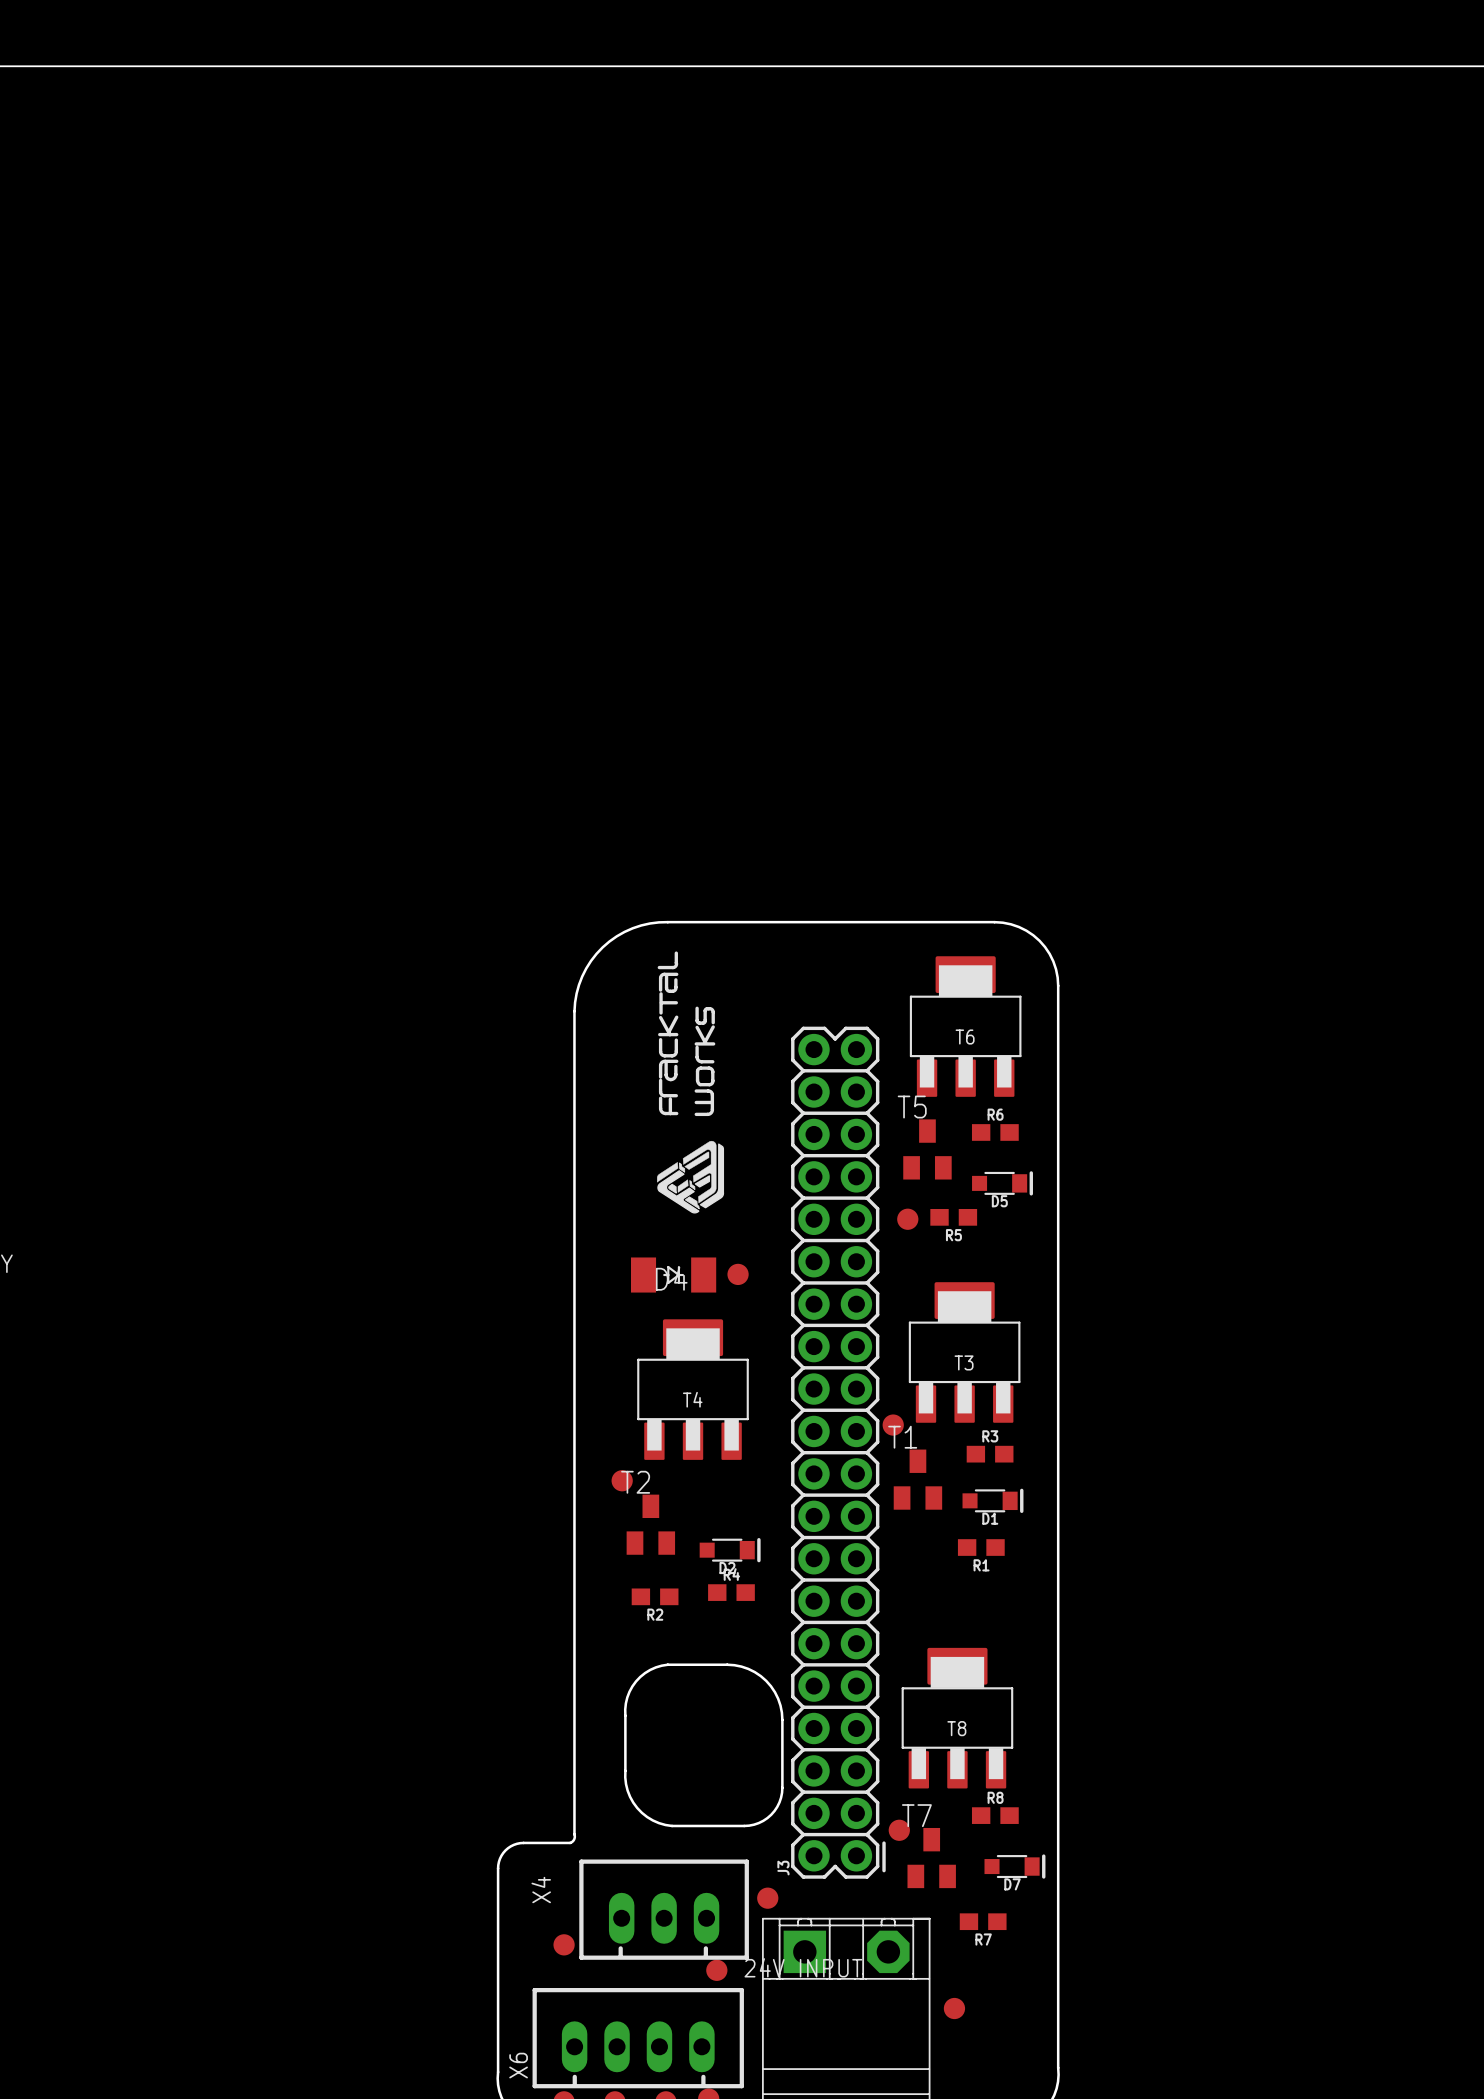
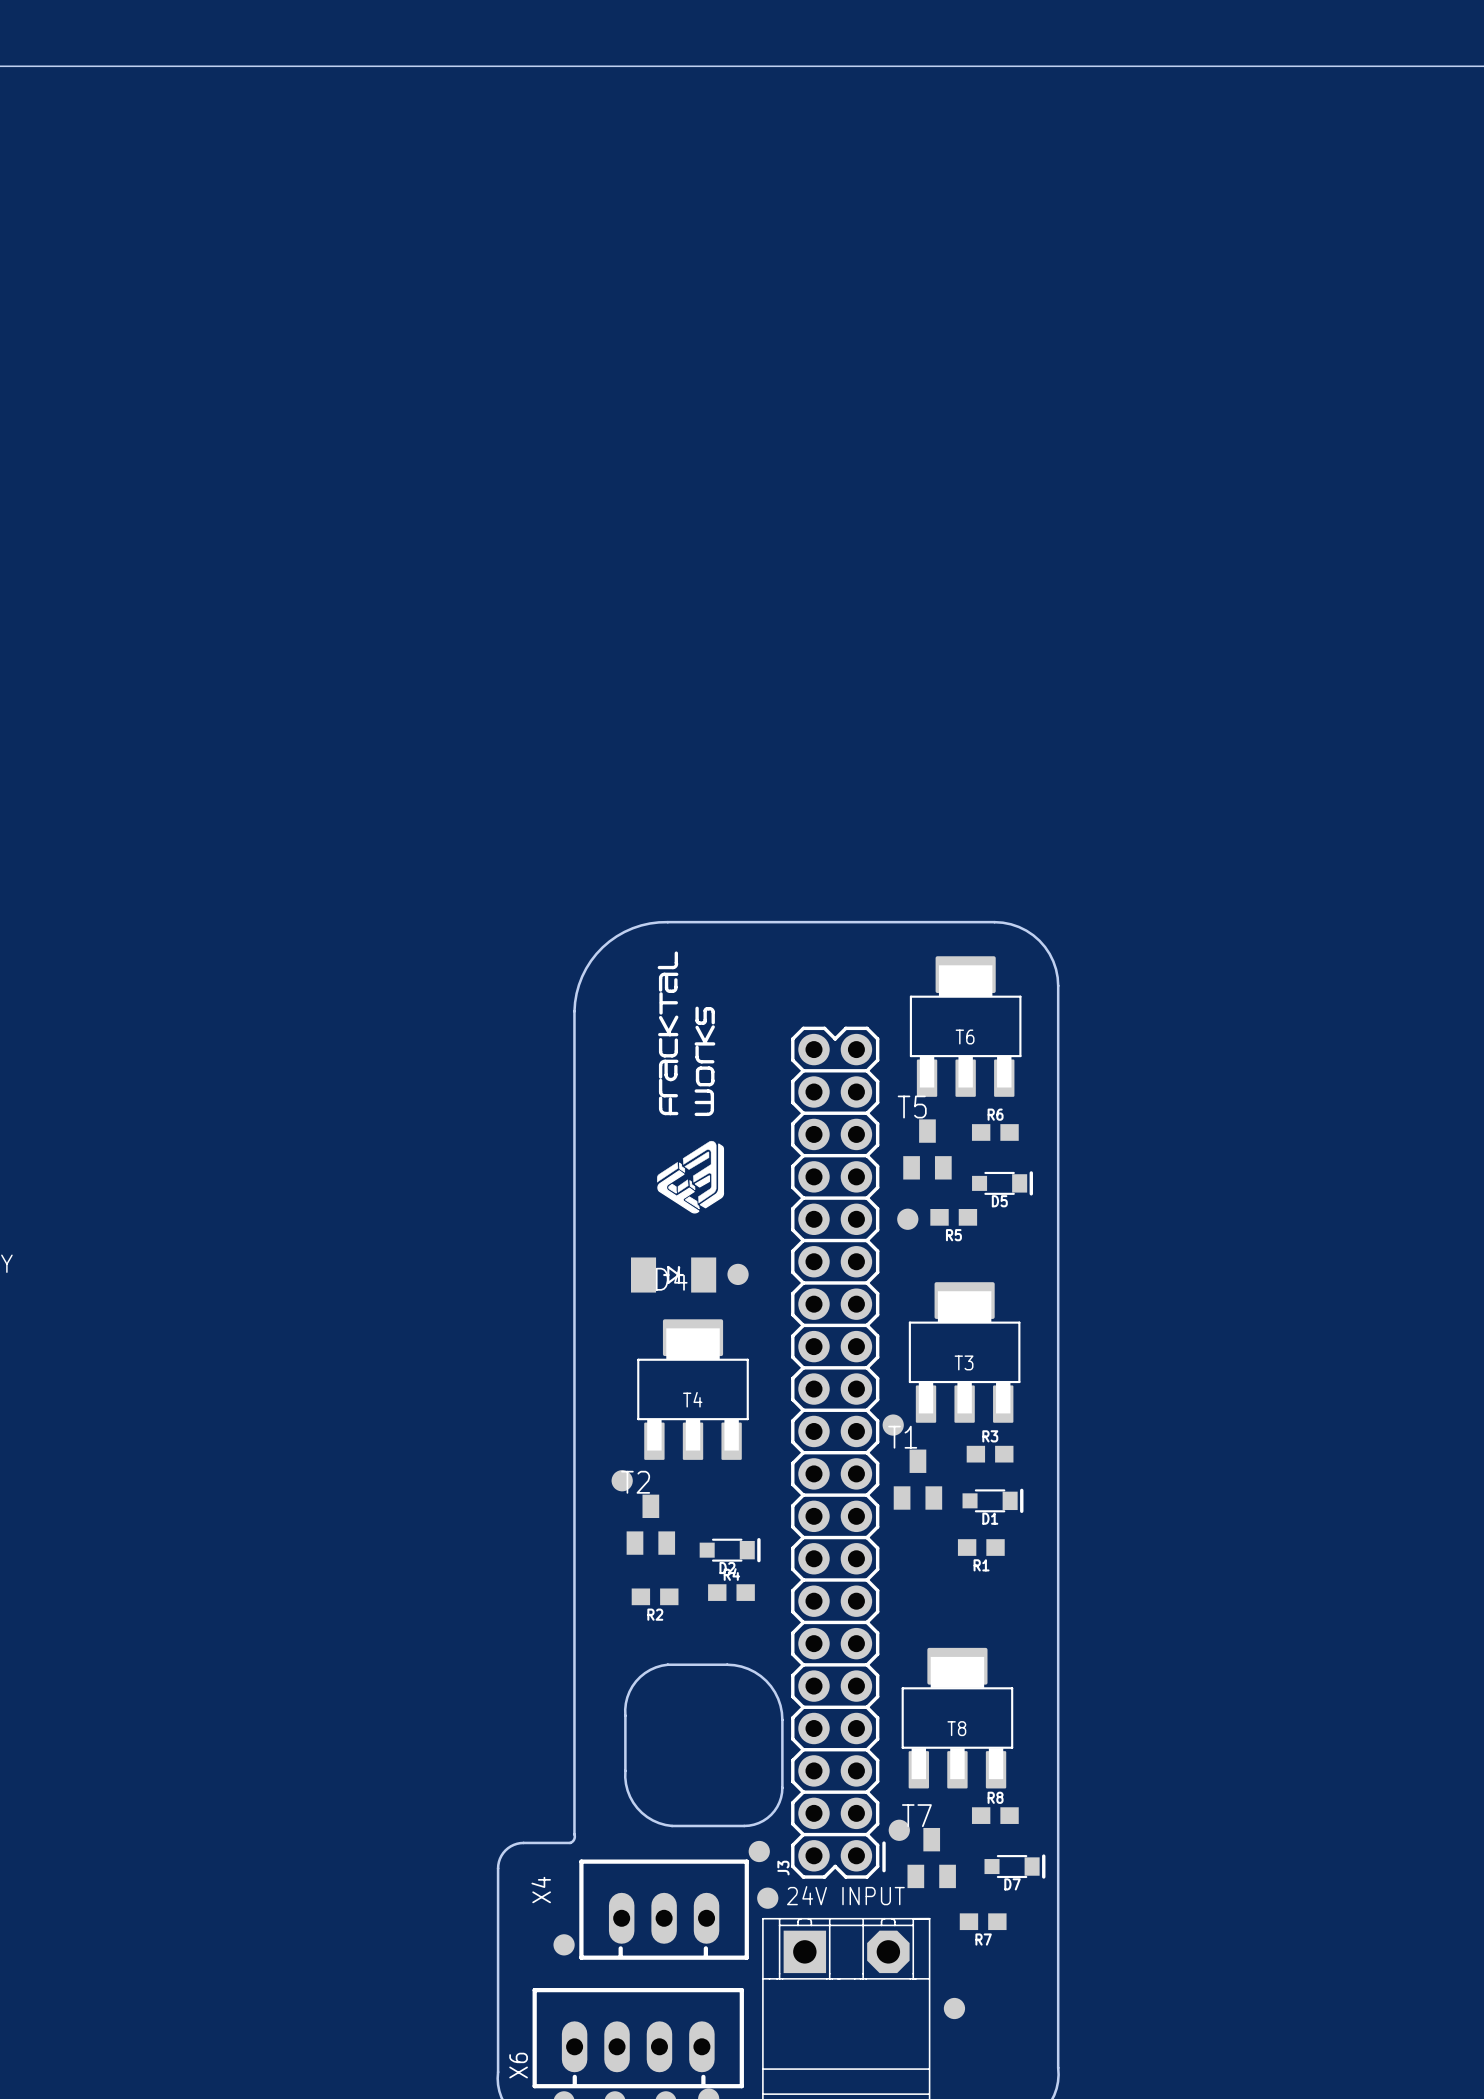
text position: 24V INPUT (803, 1967) -> 24V INPUT (845, 1895)
part position: (716, 1970) -> (759, 1851)

